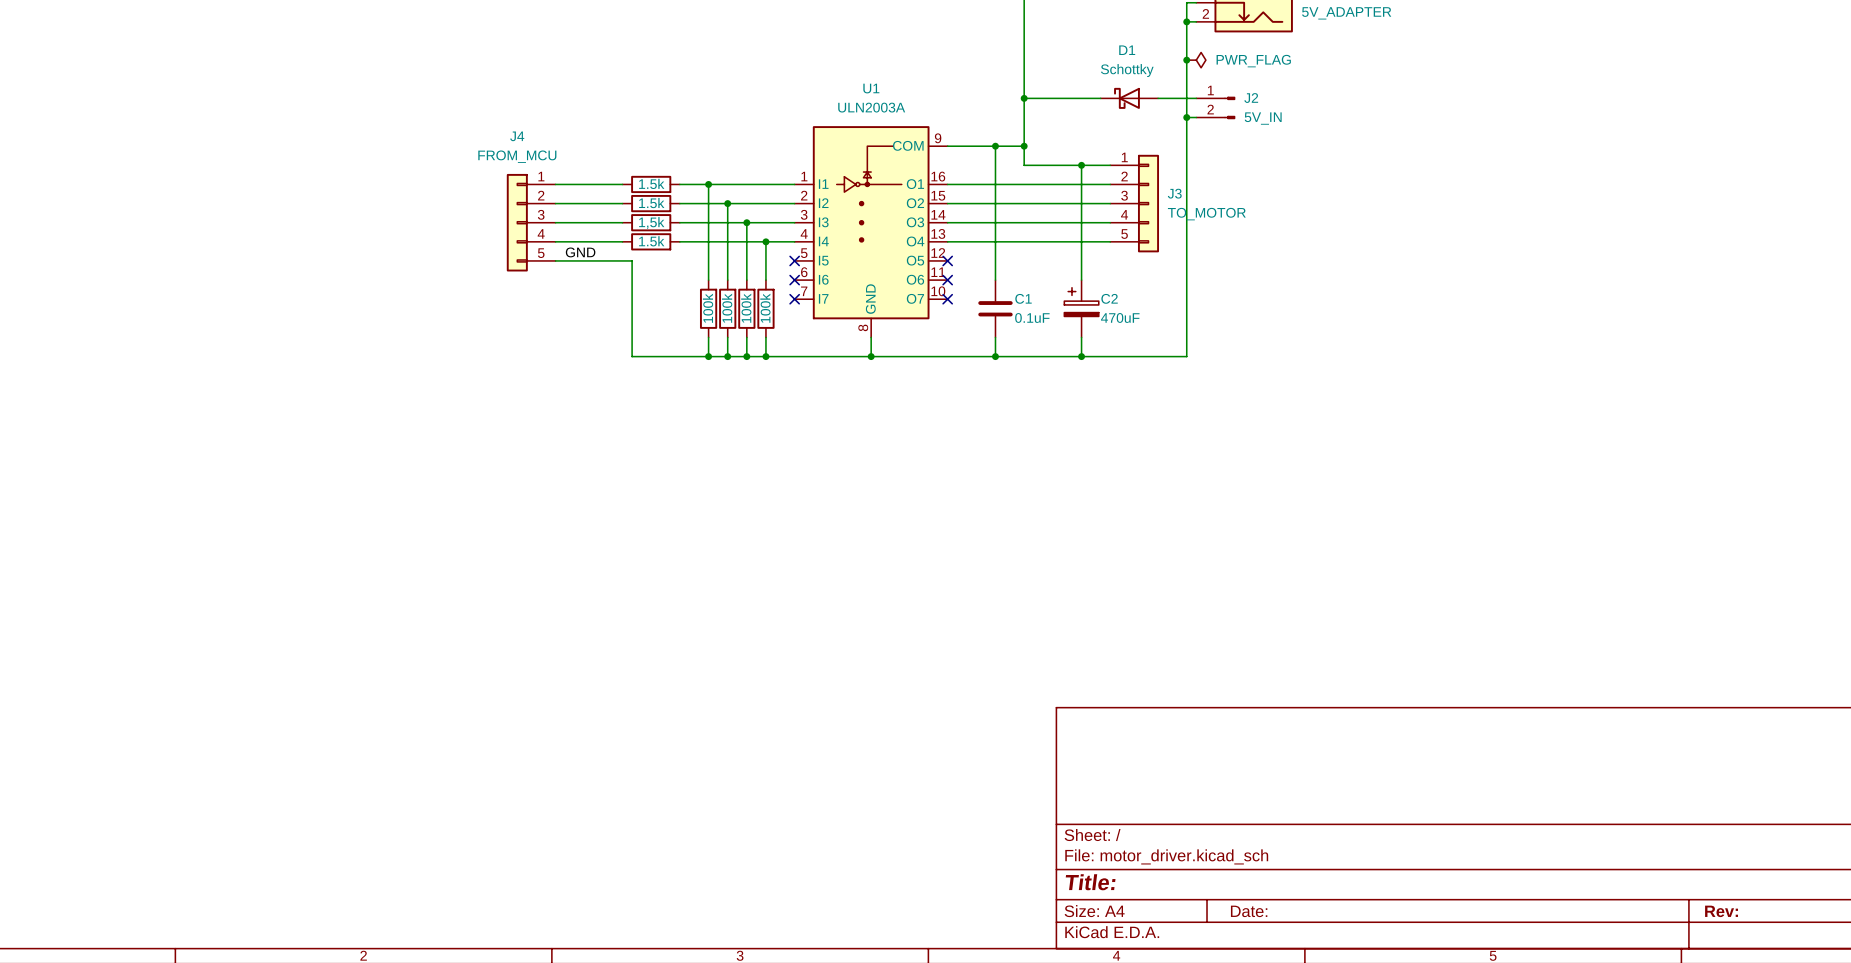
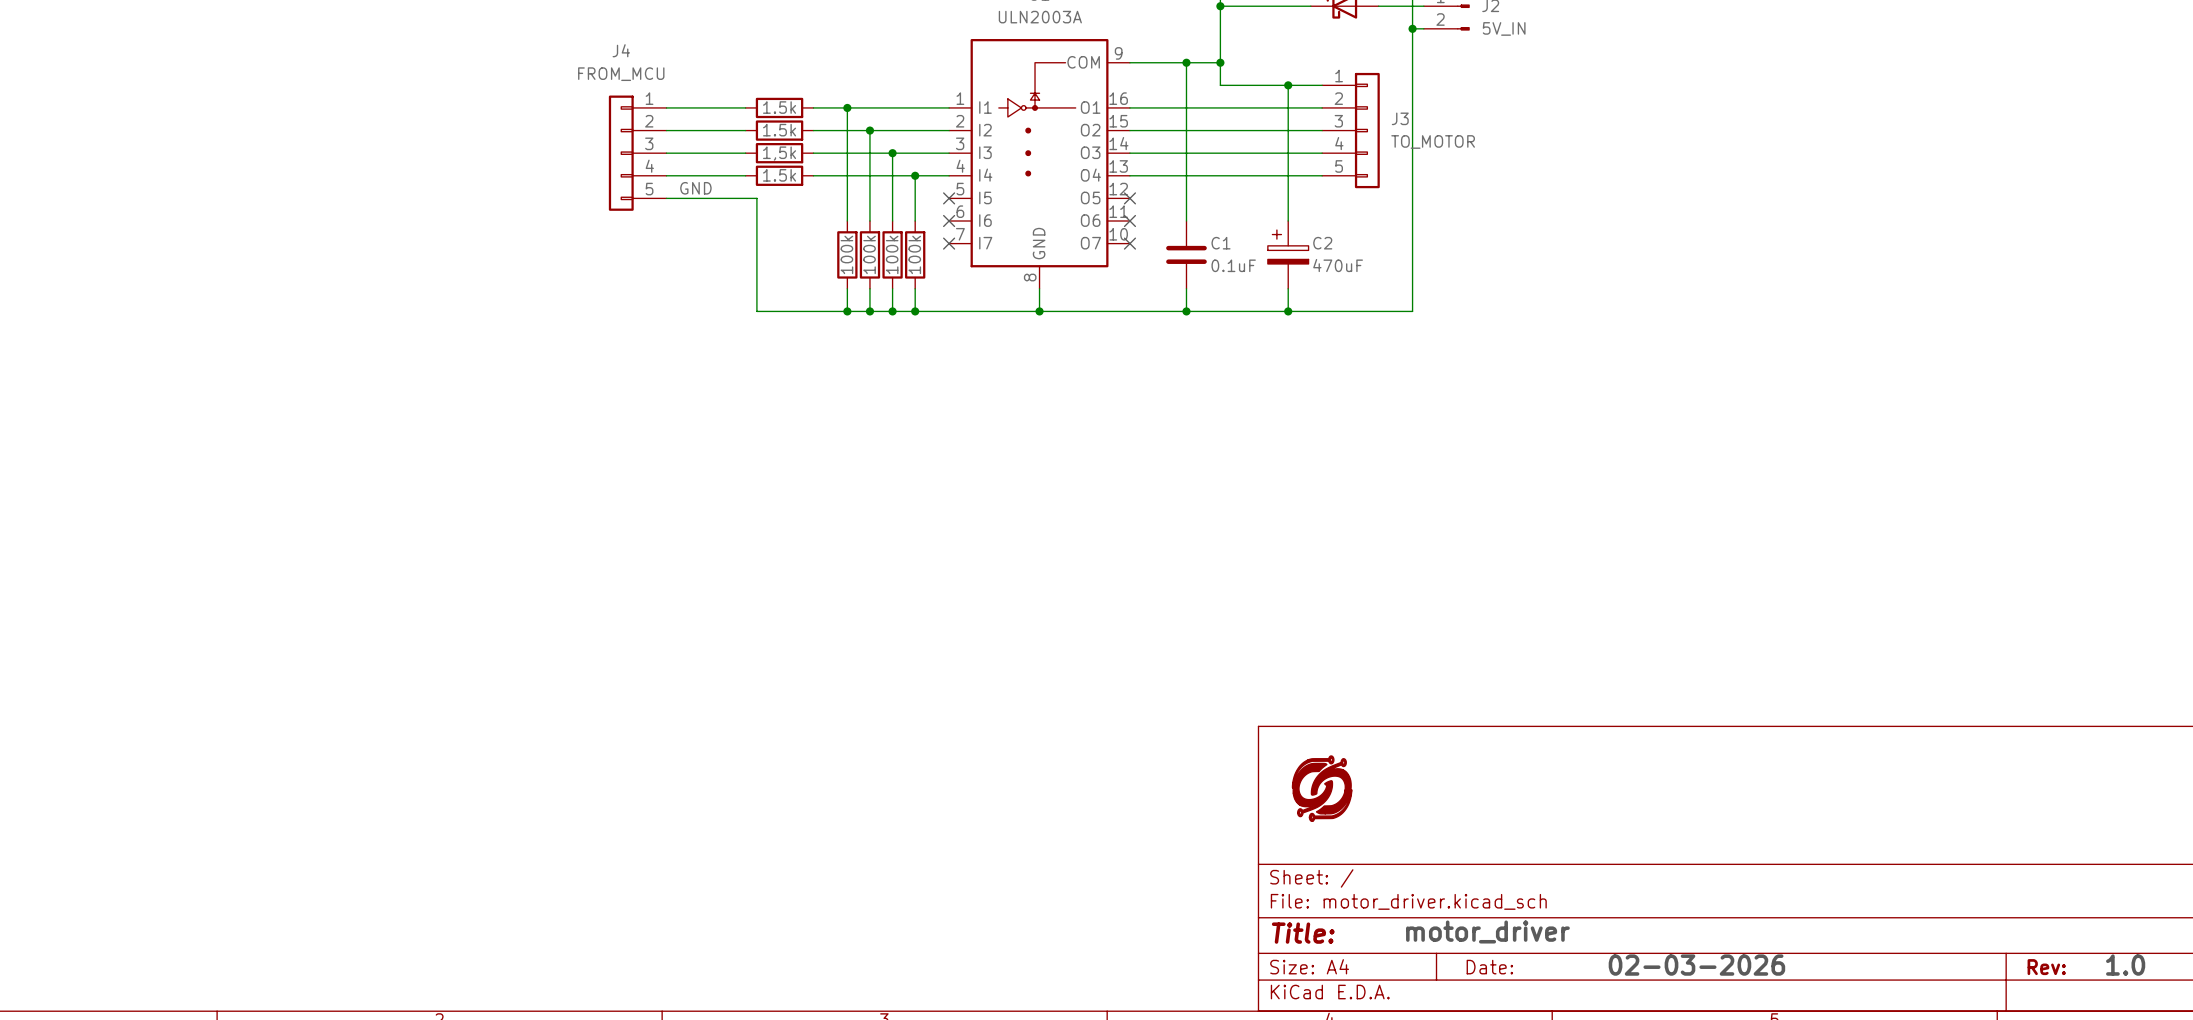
power symbol: none -> (1322, 788)
text: none -> motor_driver (1487, 932)
text: none -> 02-03-2026 (1696, 965)
text: none -> 1.0 (2125, 965)

